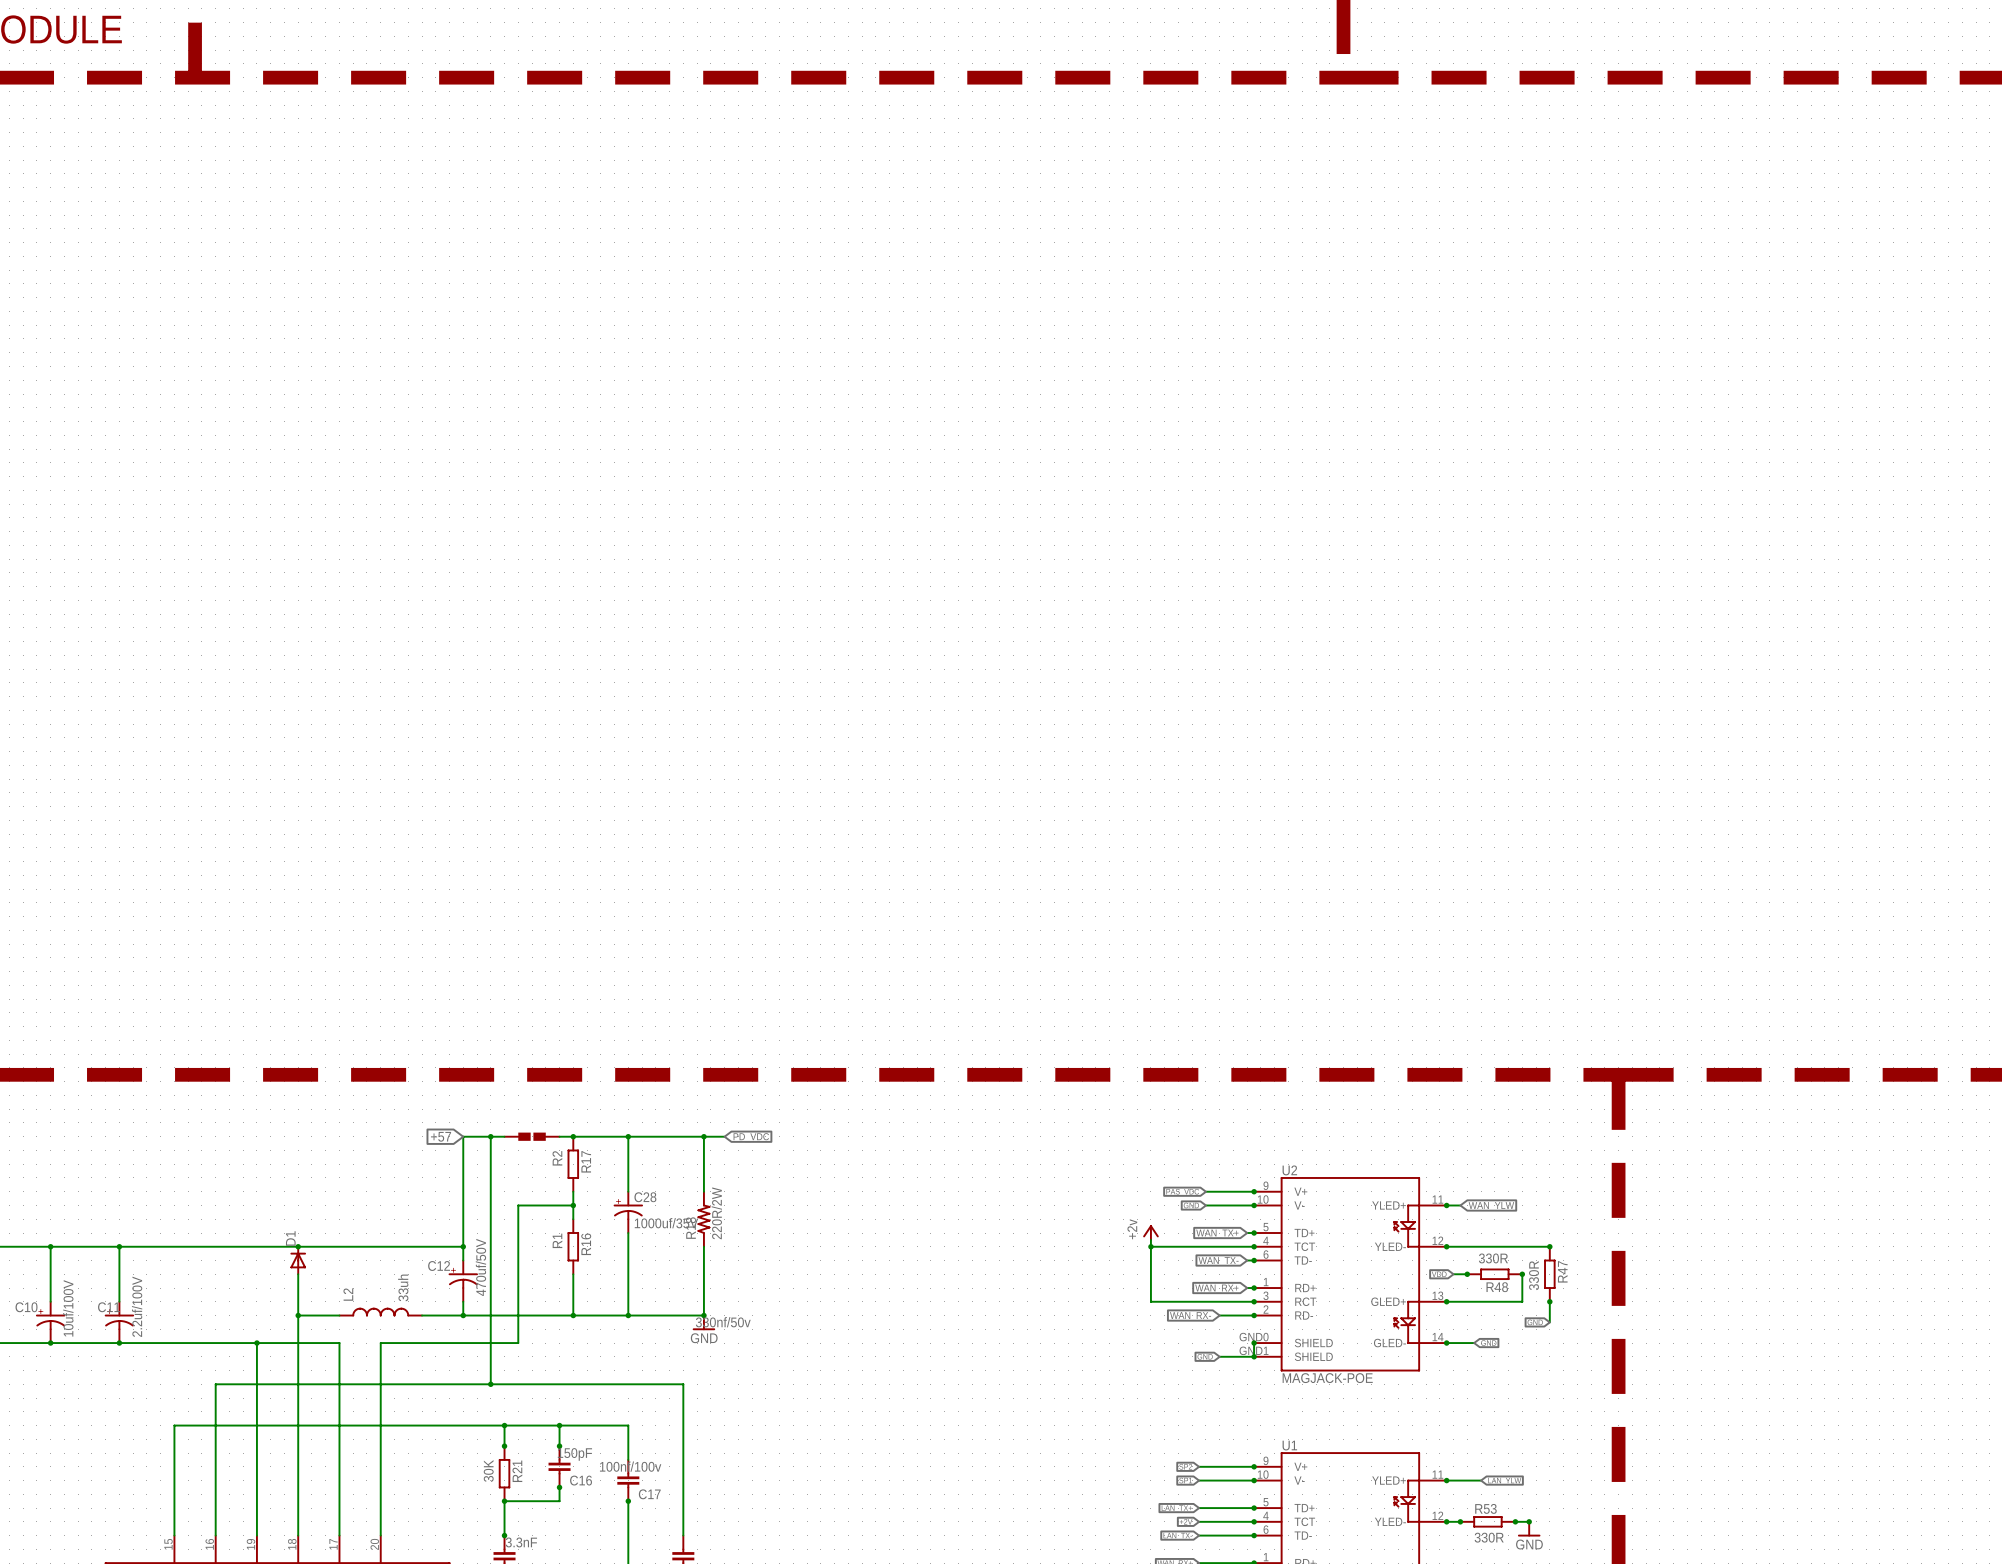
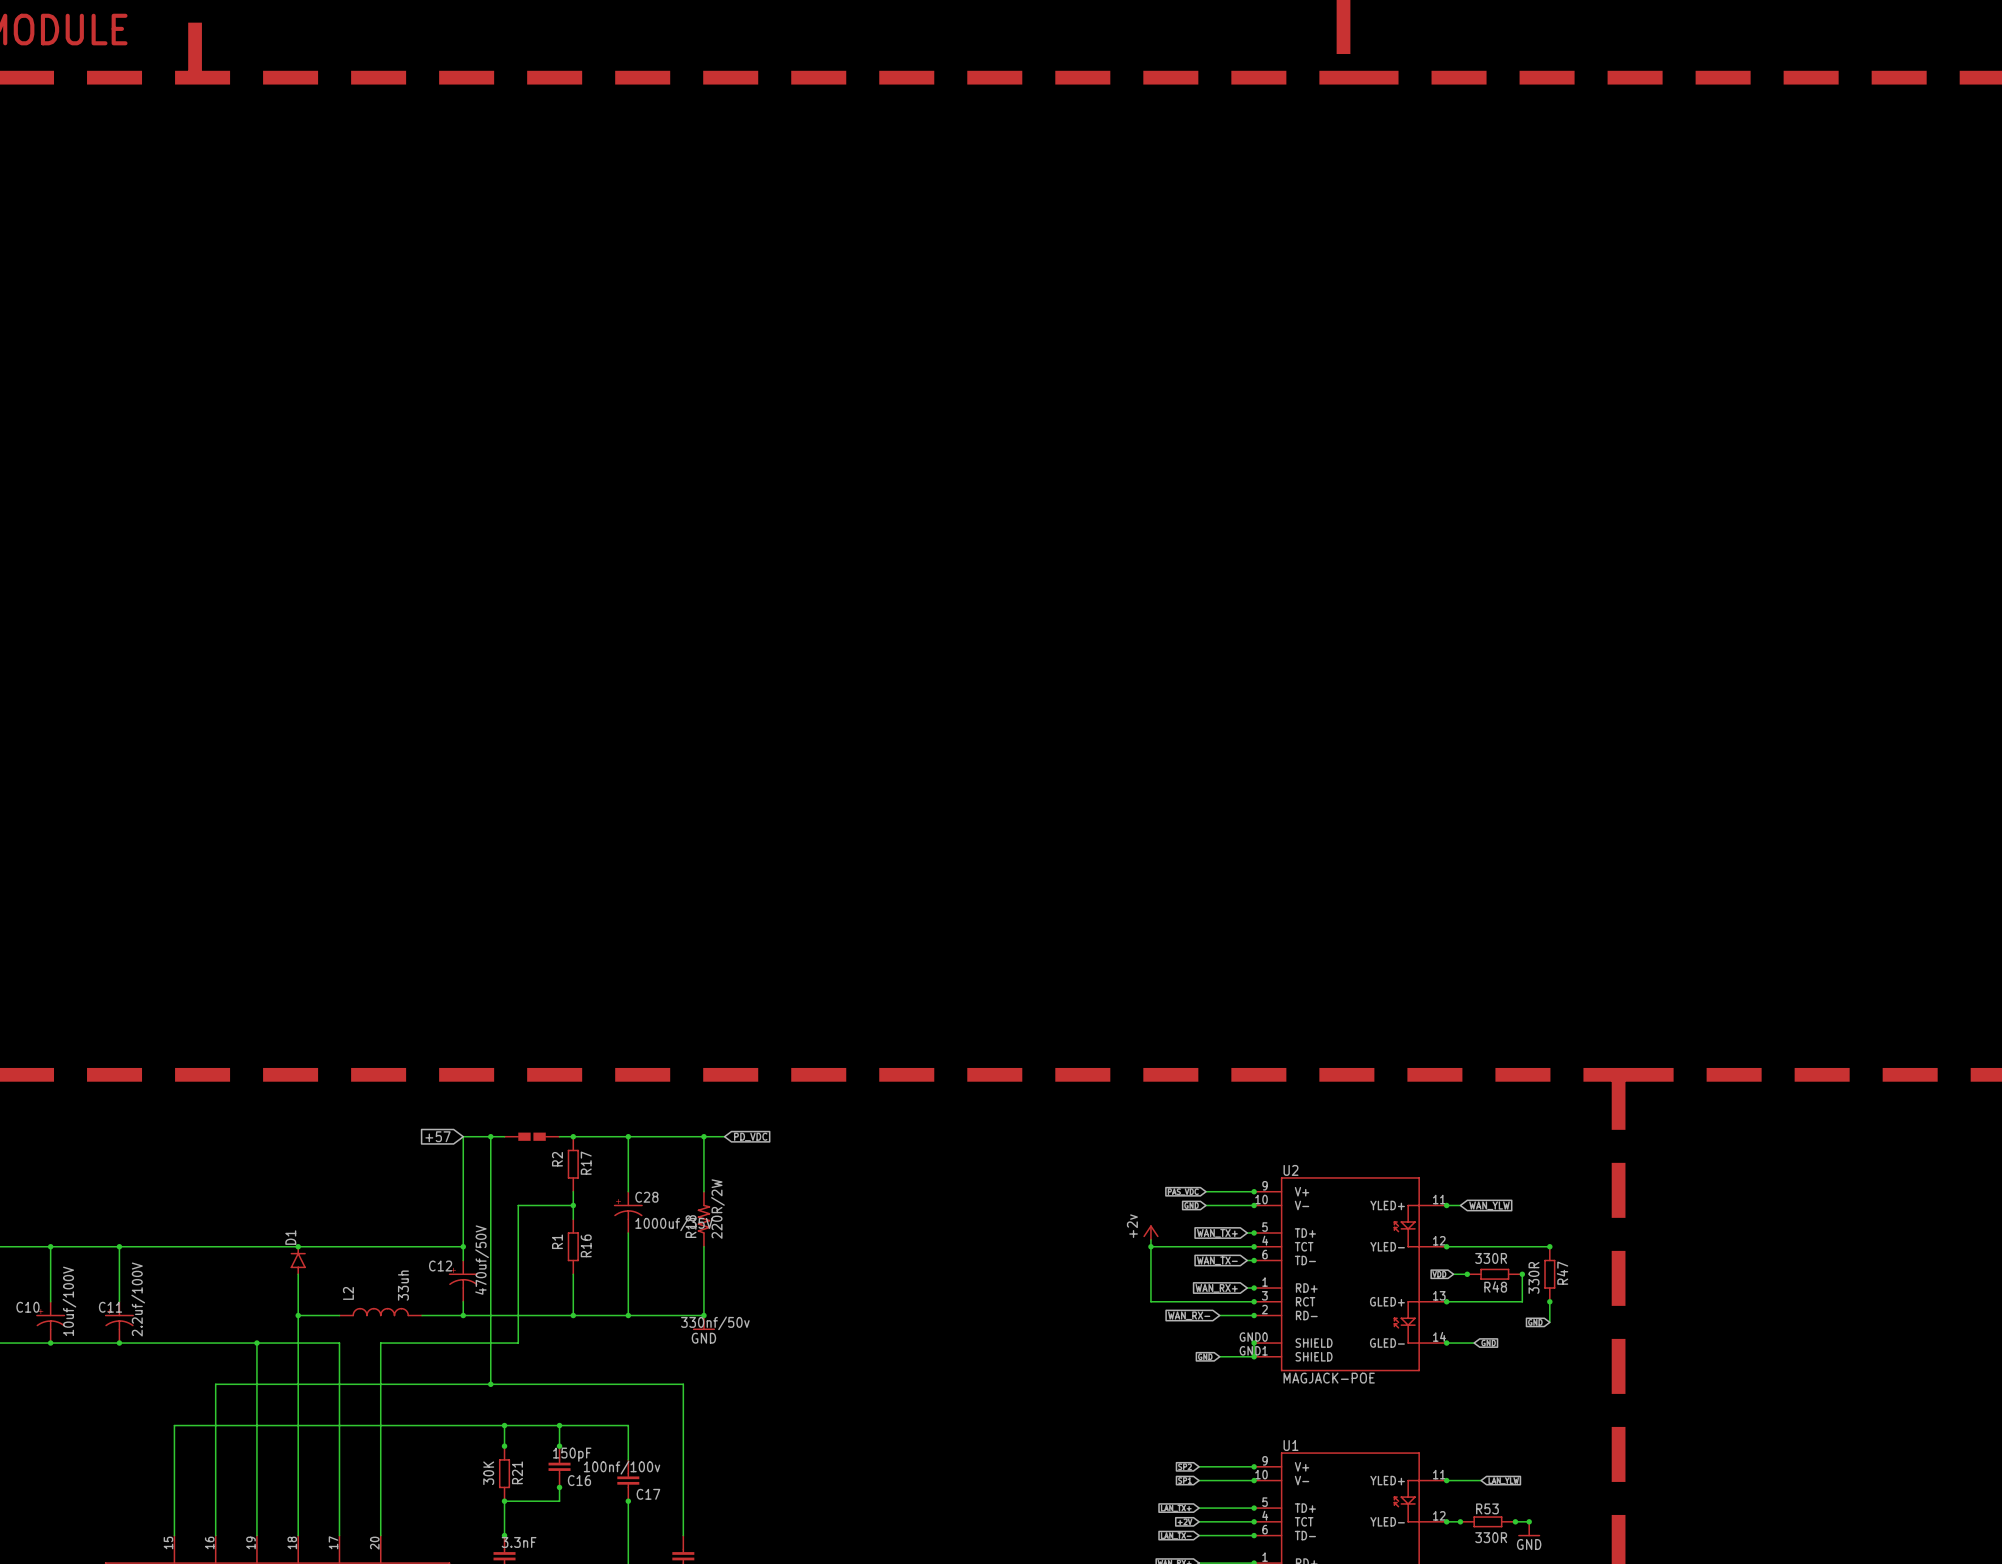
D1 symbol: [290, 1246, 306, 1275] -> [290, 1246, 306, 1275]

